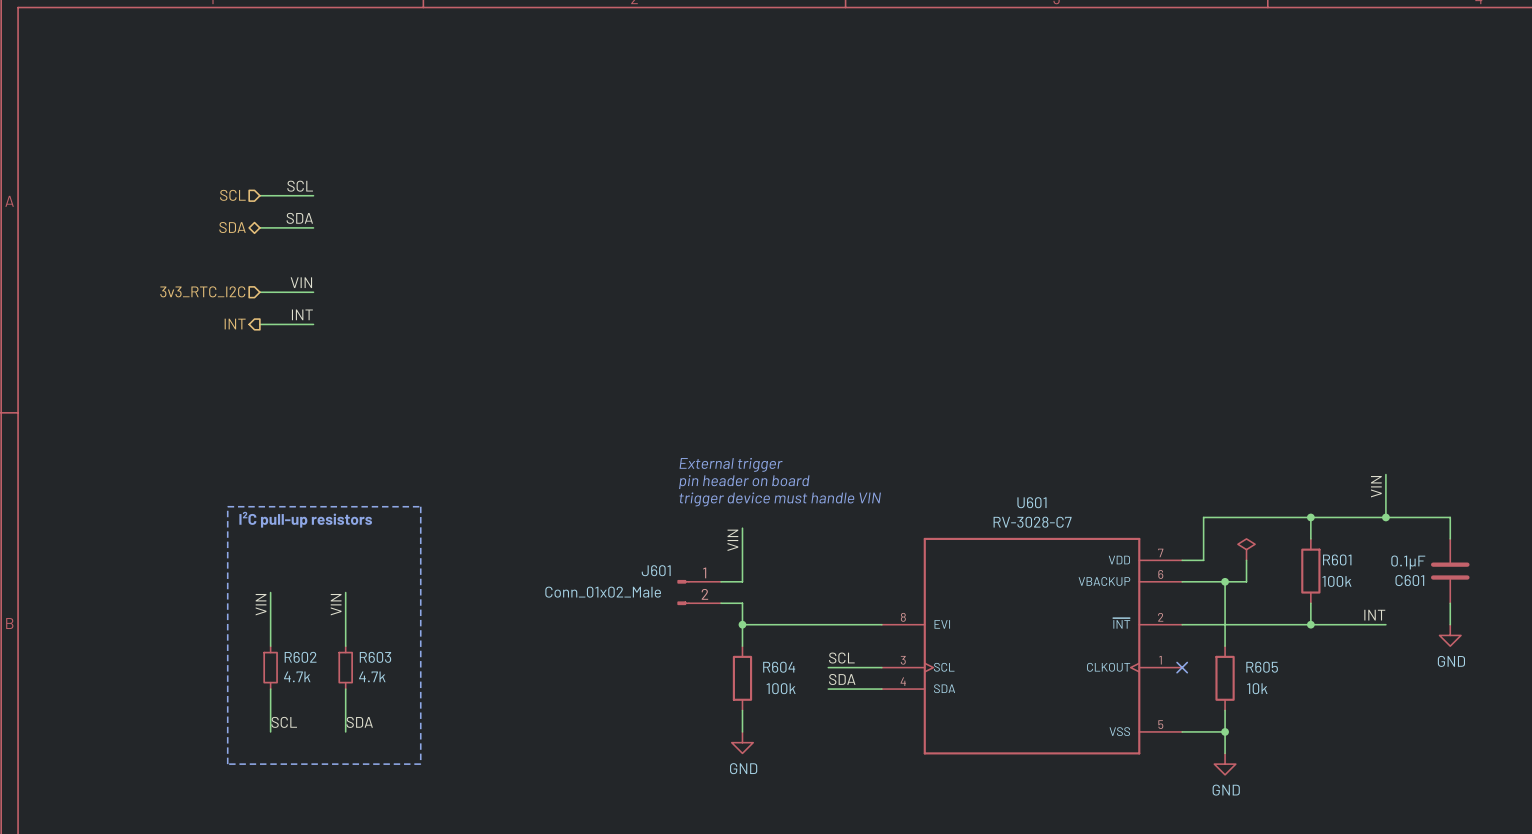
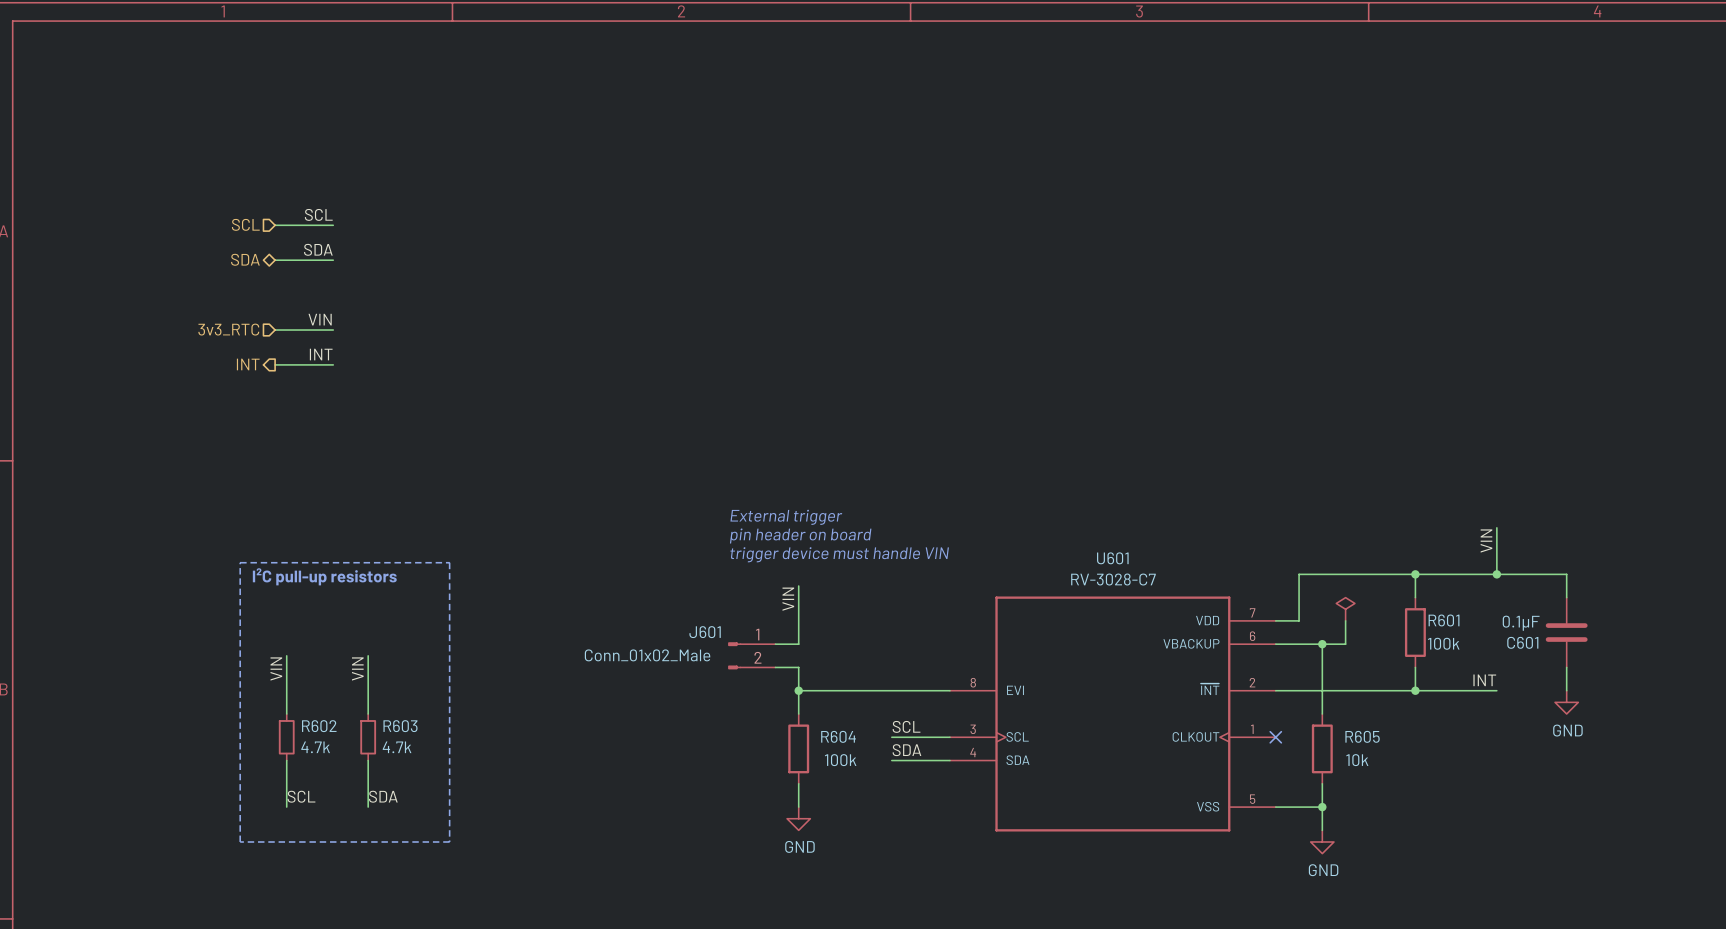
hierarchical label: 3v3_RTC_I2C (202, 291) -> 3v3_RTC (228, 329)

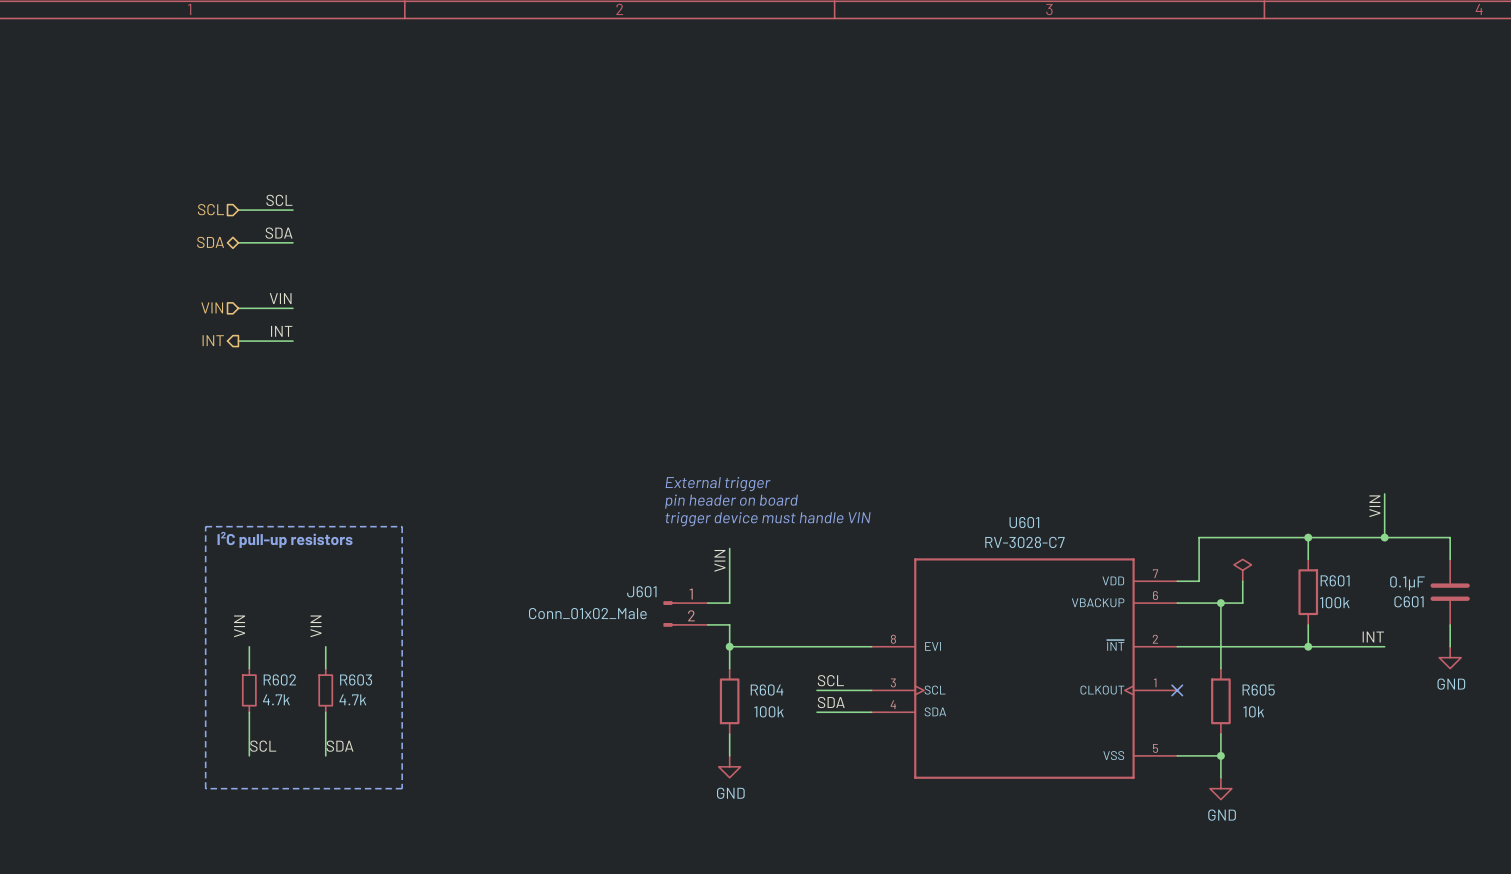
hierarchical label: 3v3_RTC (228, 329) -> VIN (212, 307)
wire: (286, 655) (286, 690) -> none
wire: (368, 655) (368, 690) -> none

